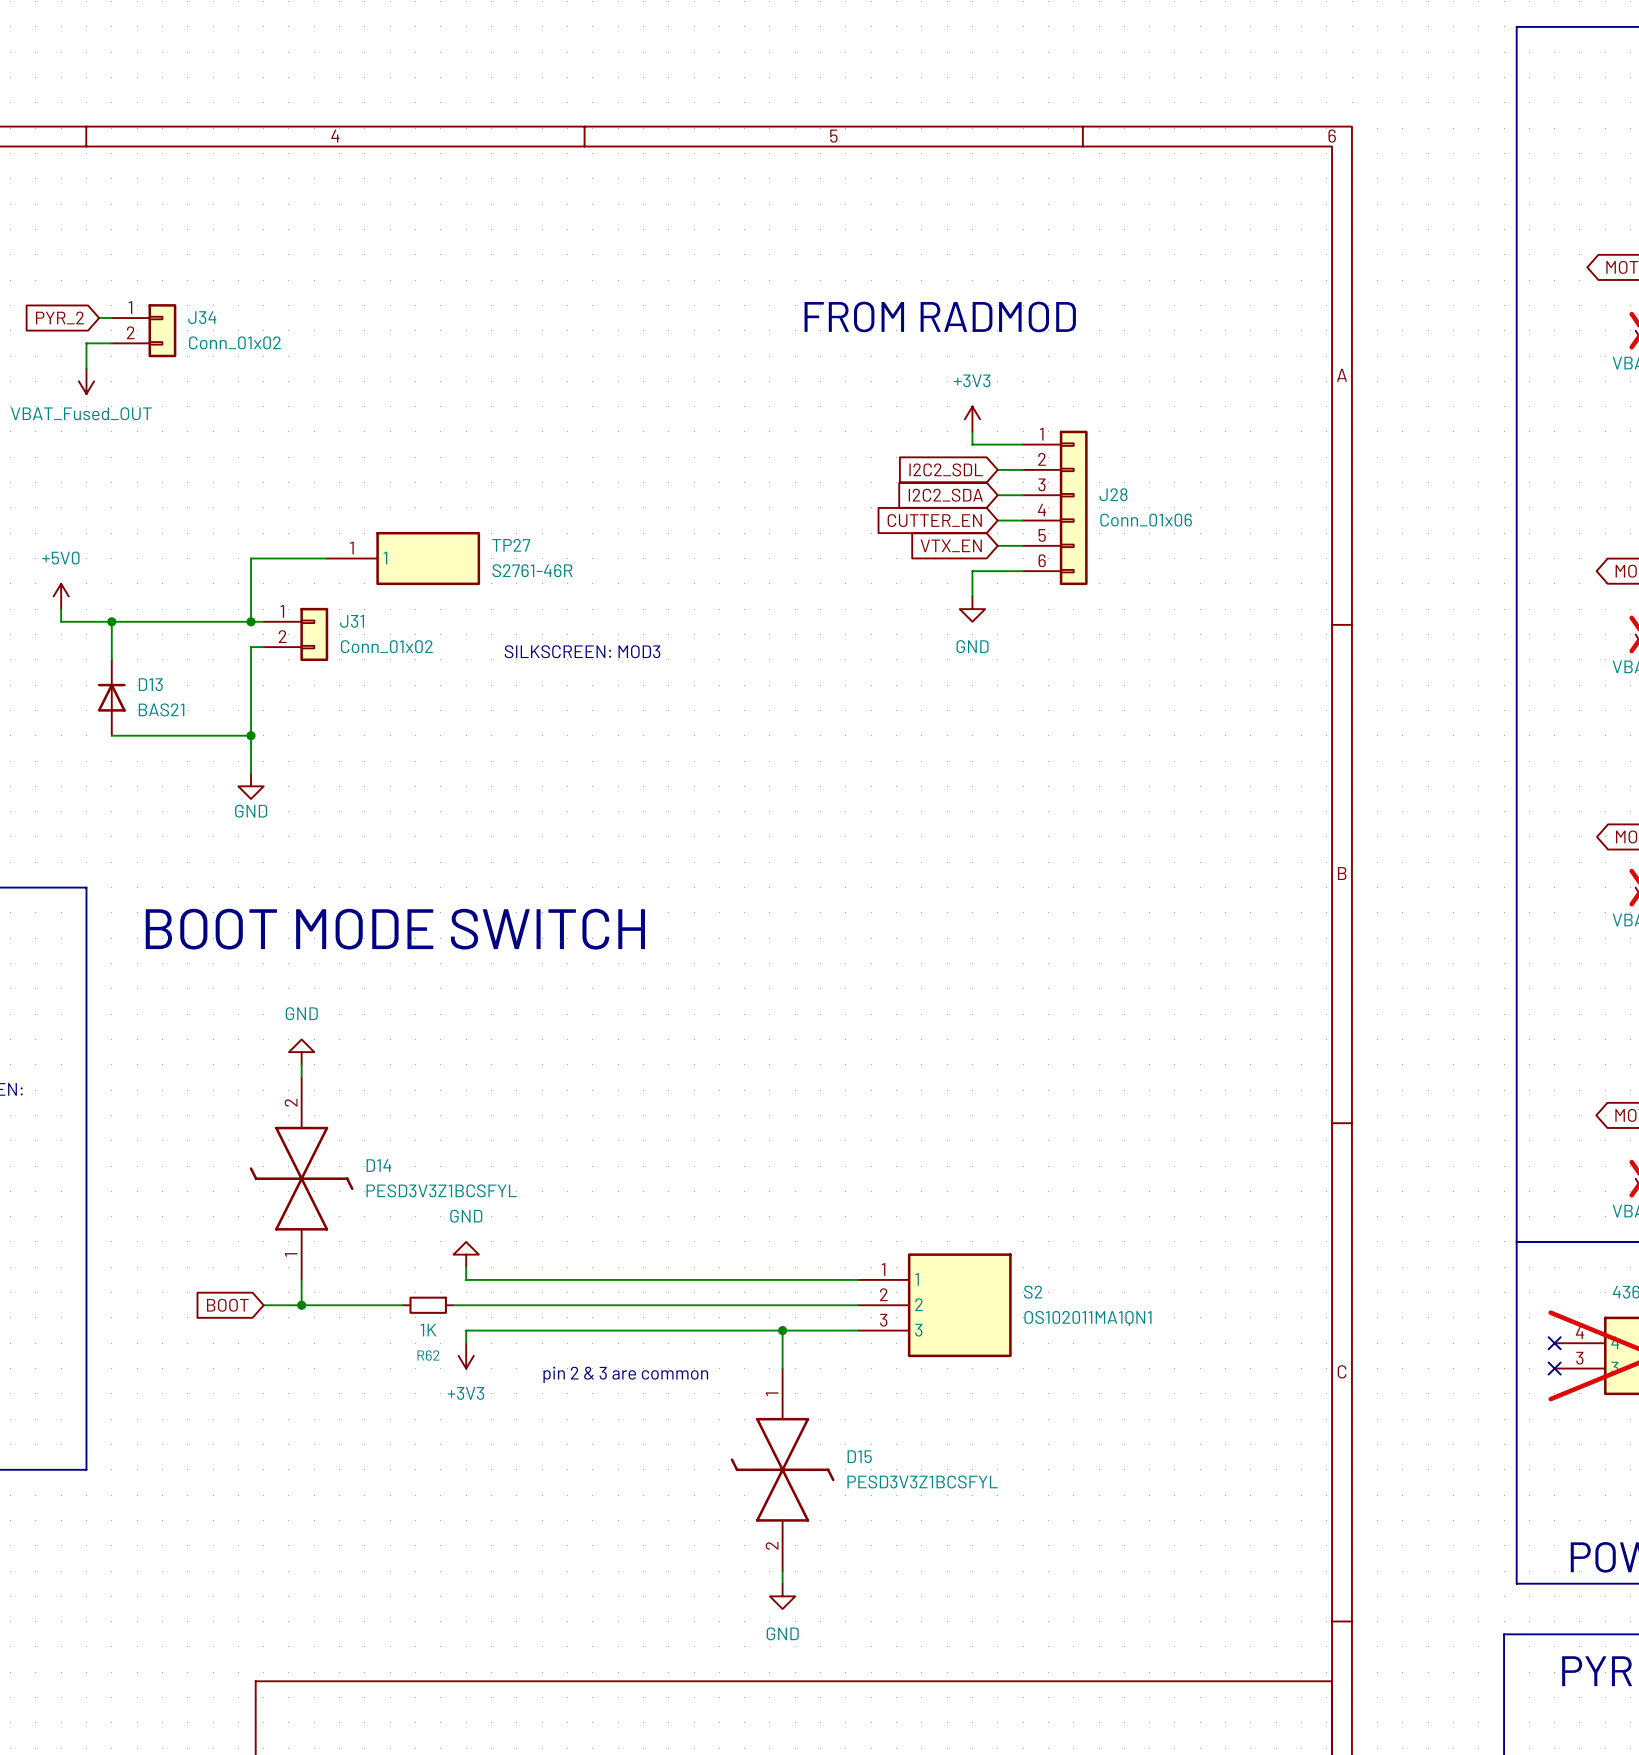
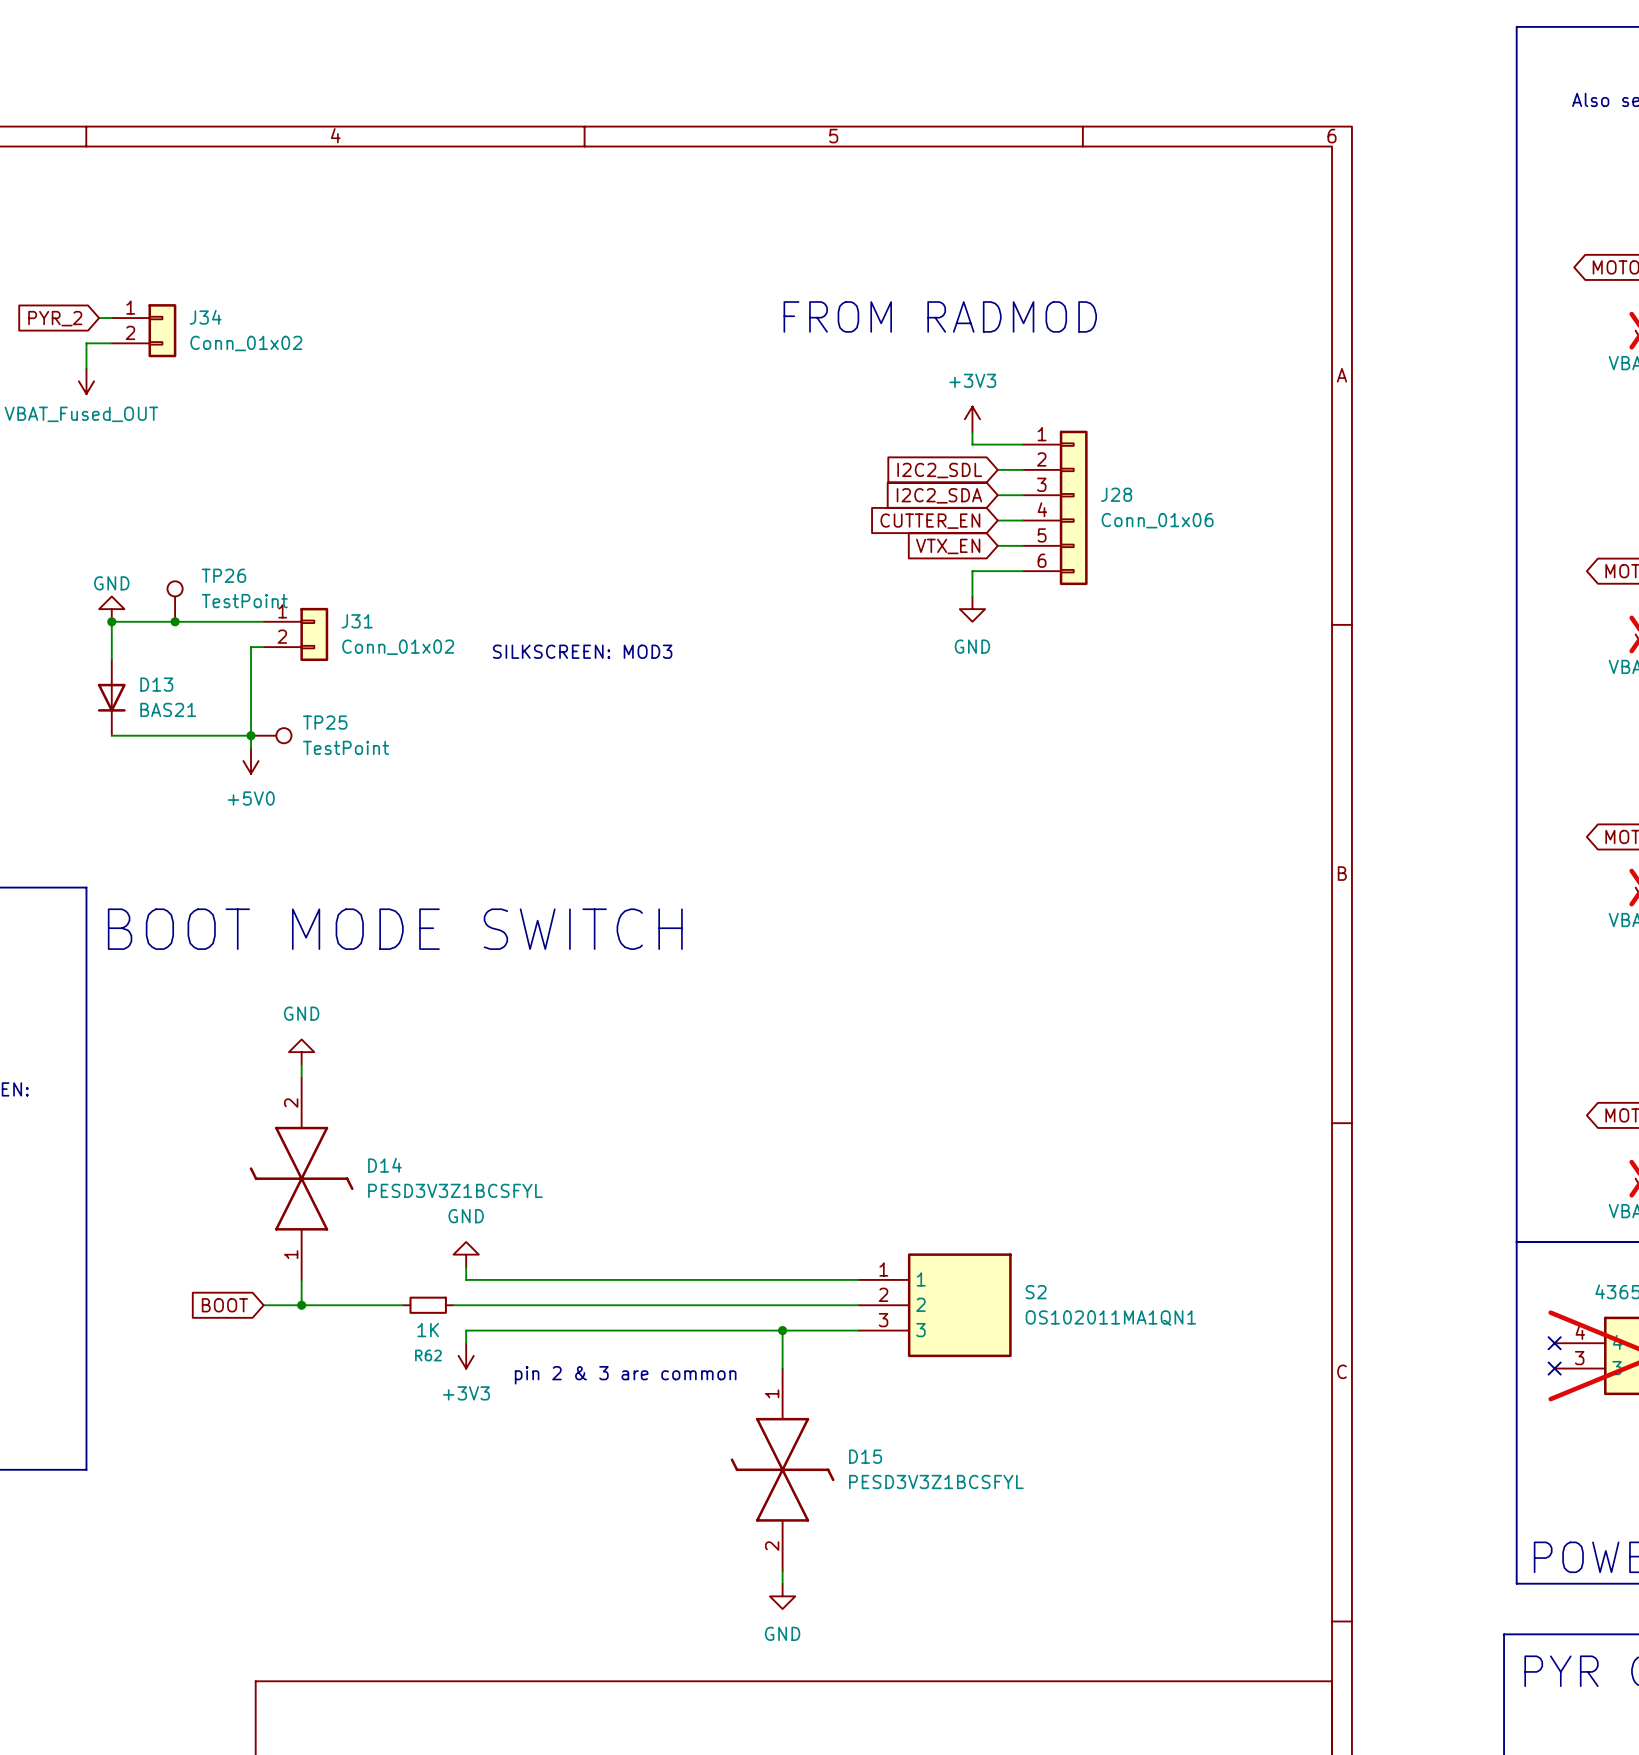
wire: (326, 558) (251, 558) (251, 621) -> none
TP27: S2761-46R (403, 558) -> none
power symbol: +5V0 (61, 596) -> none
TP26: none -> TestPoint (175, 601)
wire: (61, 609) (61, 621) (111, 621) -> none
junction: none -> (175, 621)
junction: (251, 621) -> none
D13 rotation: 0° (111, 697) -> 180° (111, 697)
TP25: none -> TestPoint (271, 735)
power symbol: none -> +5V0 (251, 761)
power symbol rotation: 0° (251, 786) -> 180° (111, 609)
power symbol position: GND (251, 786) -> GND (111, 609)

